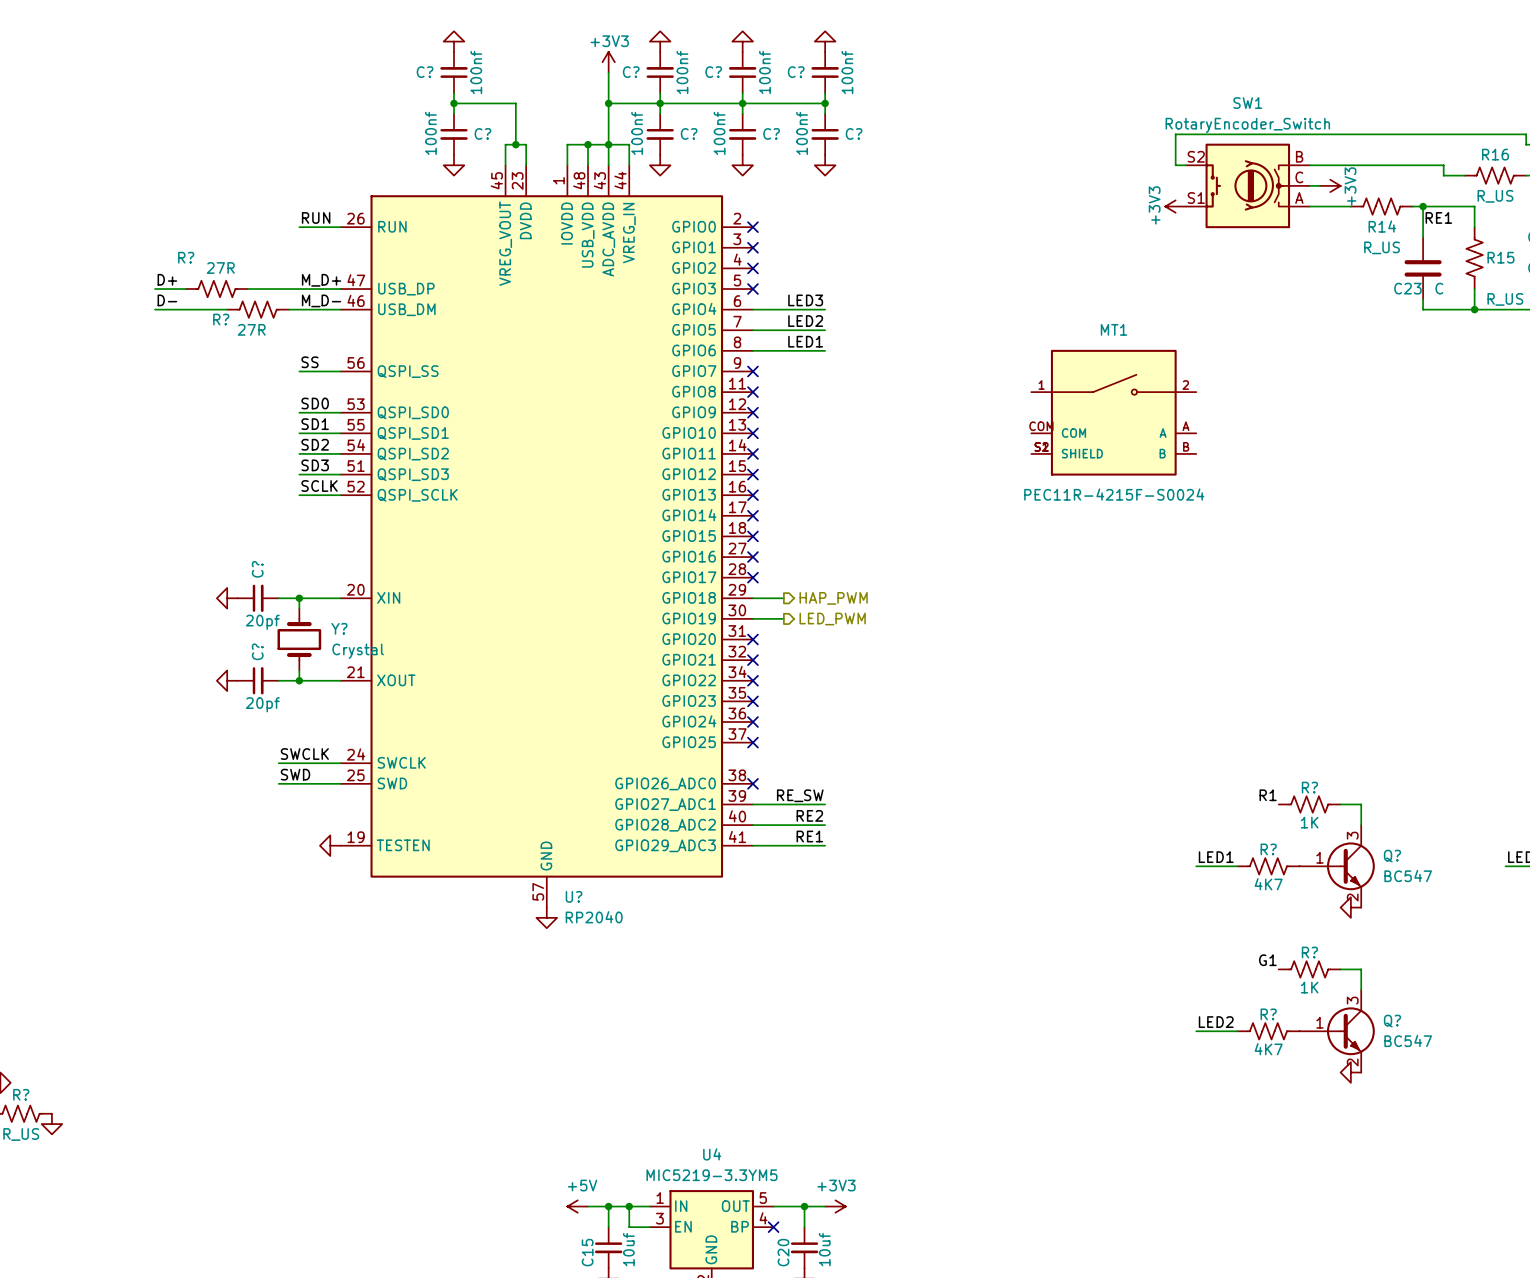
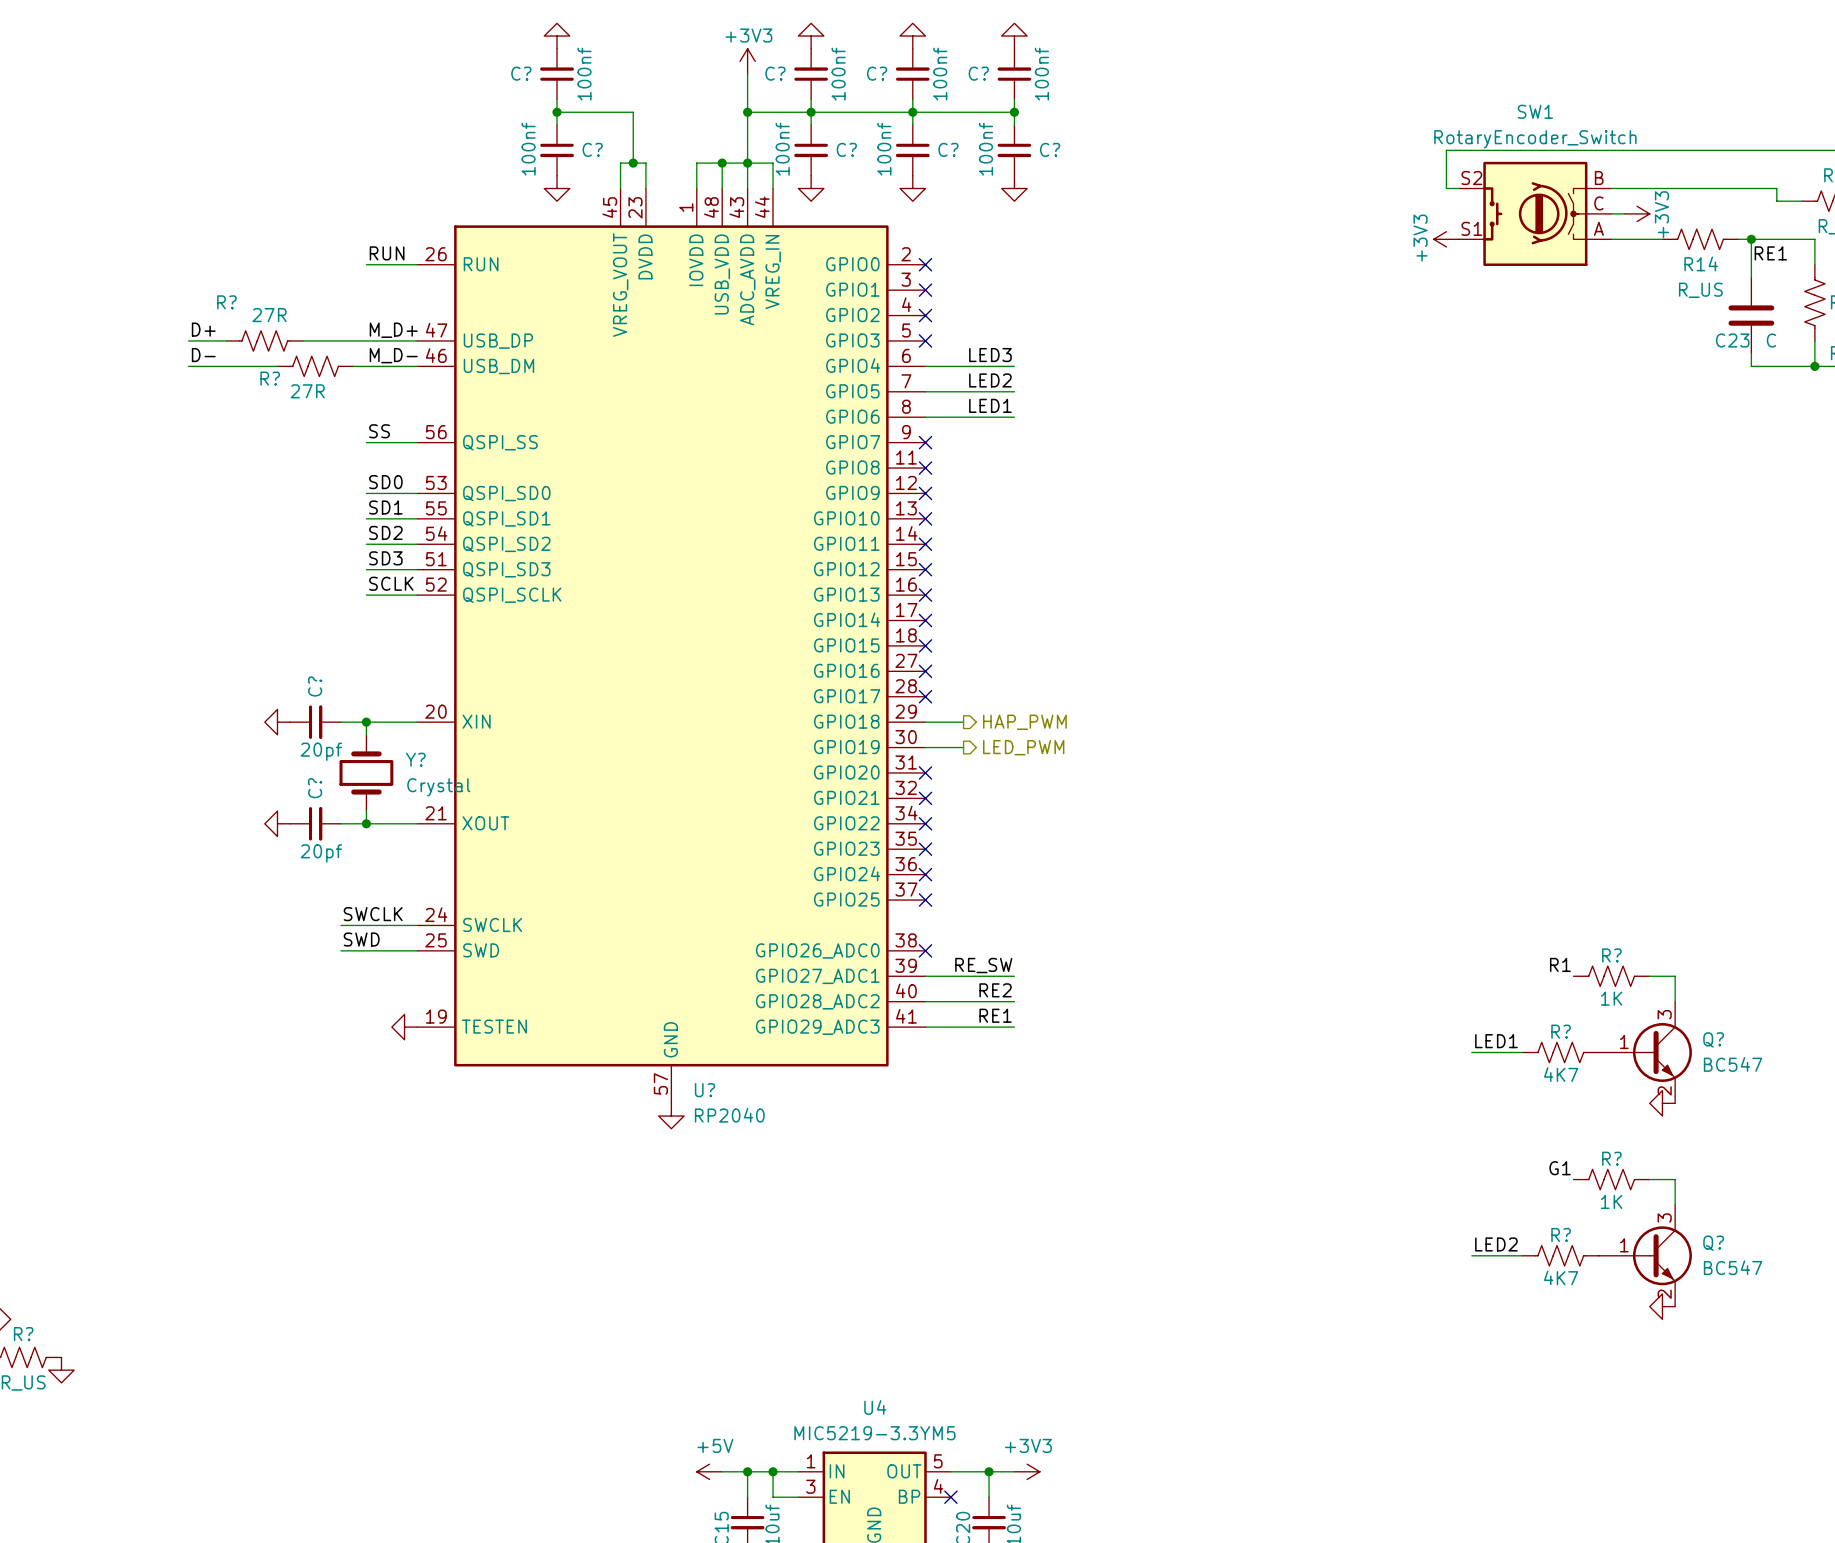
MT1: PEC11R-4215F-S0024 (1113, 412) -> none

